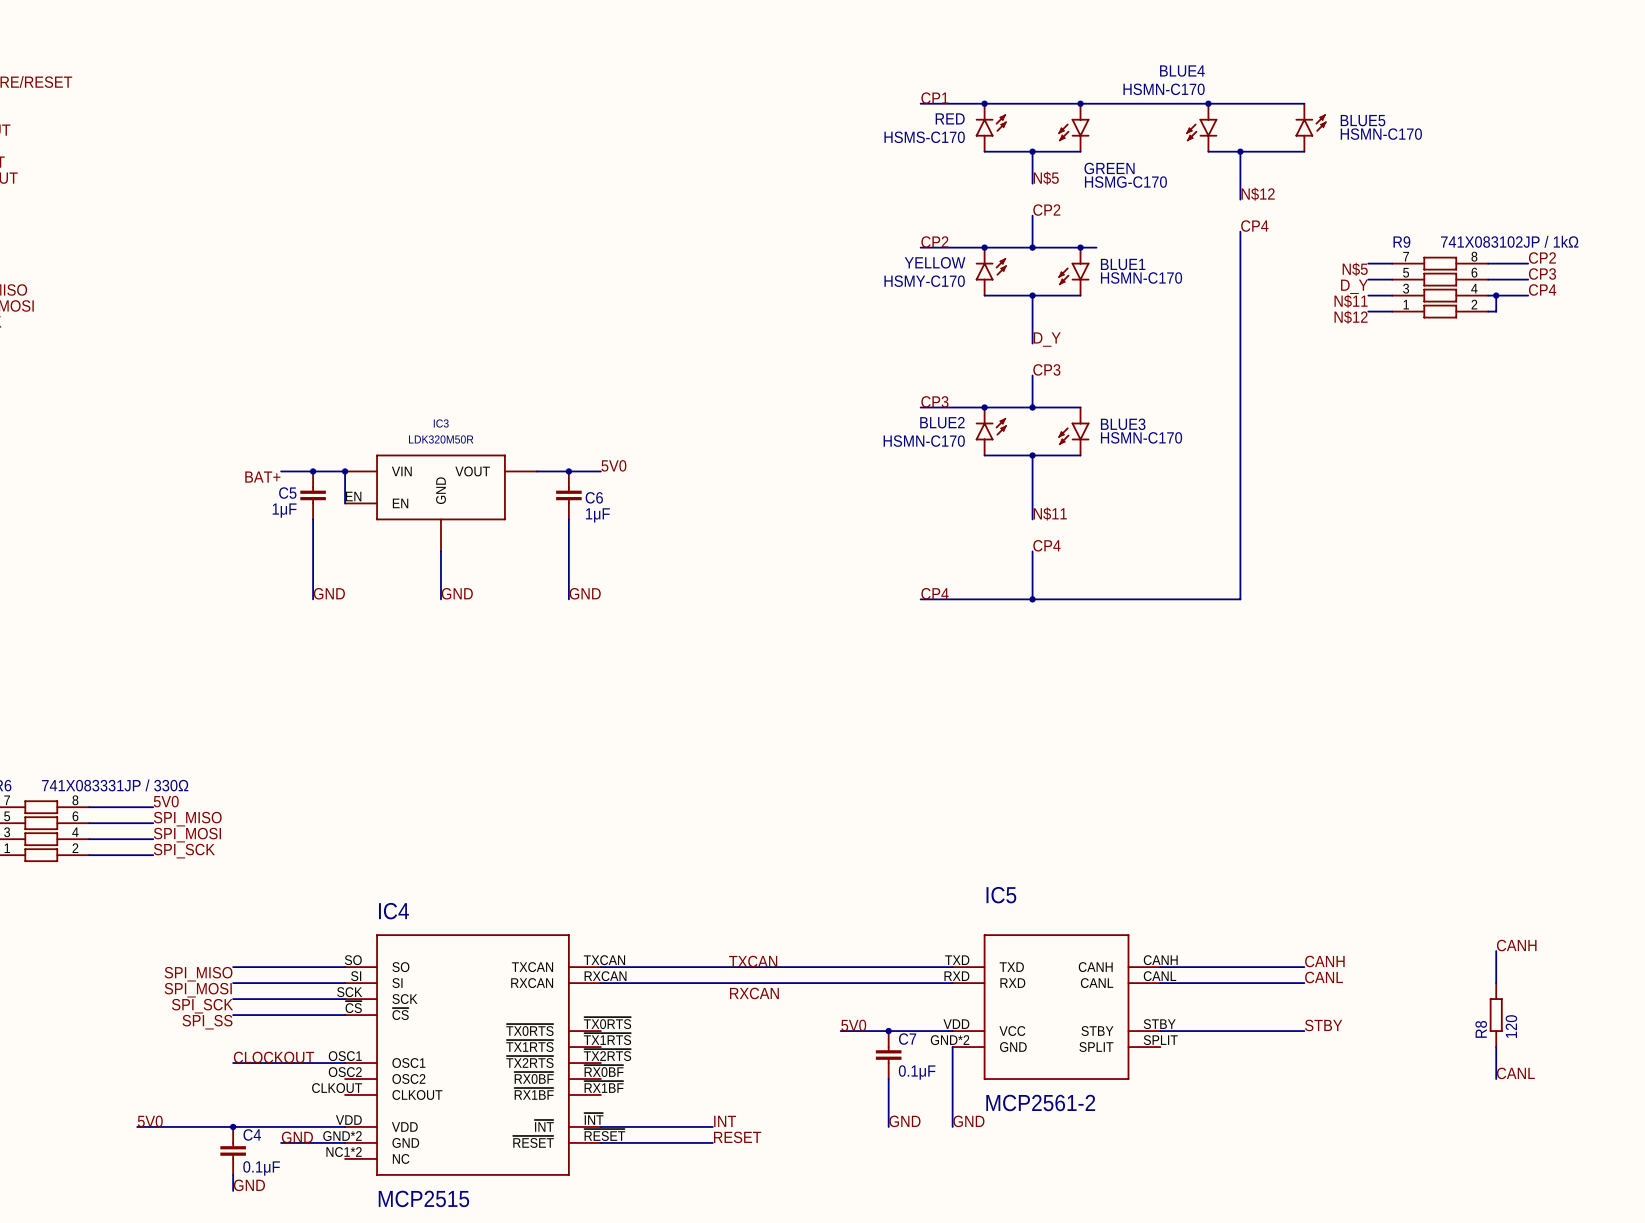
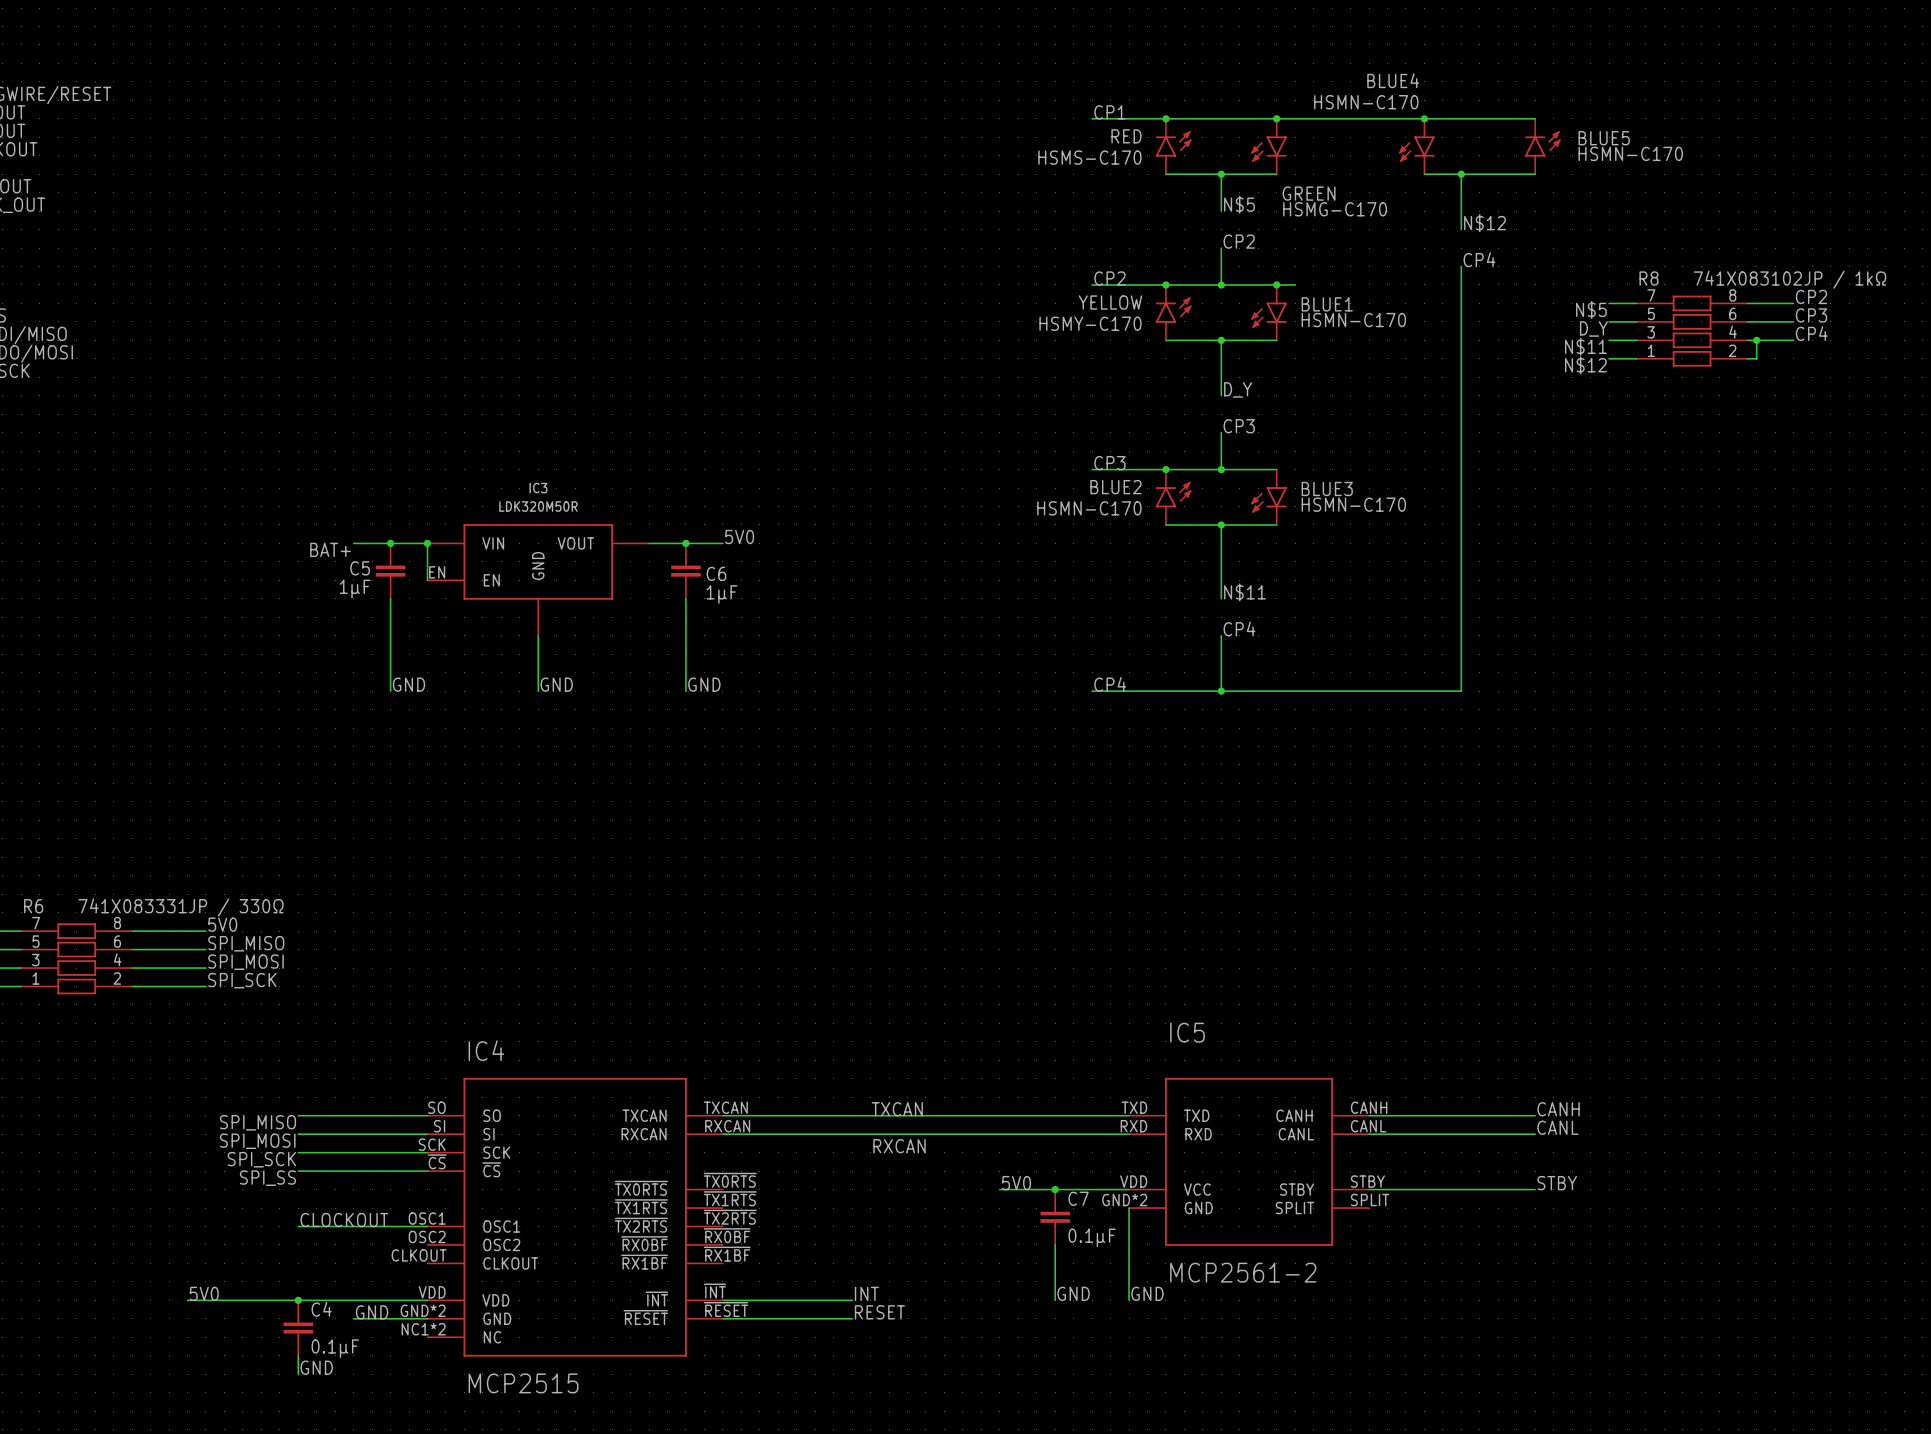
R9 name: R9 (1401, 242) -> R8 (1649, 278)
label: CANH (1516, 945) -> none
wire: (1496, 951) (1496, 983) -> none
R8: 120 (1496, 1015) -> none
wire: (1496, 1047) (1496, 1079) -> none
label: CANL (1515, 1073) -> none

